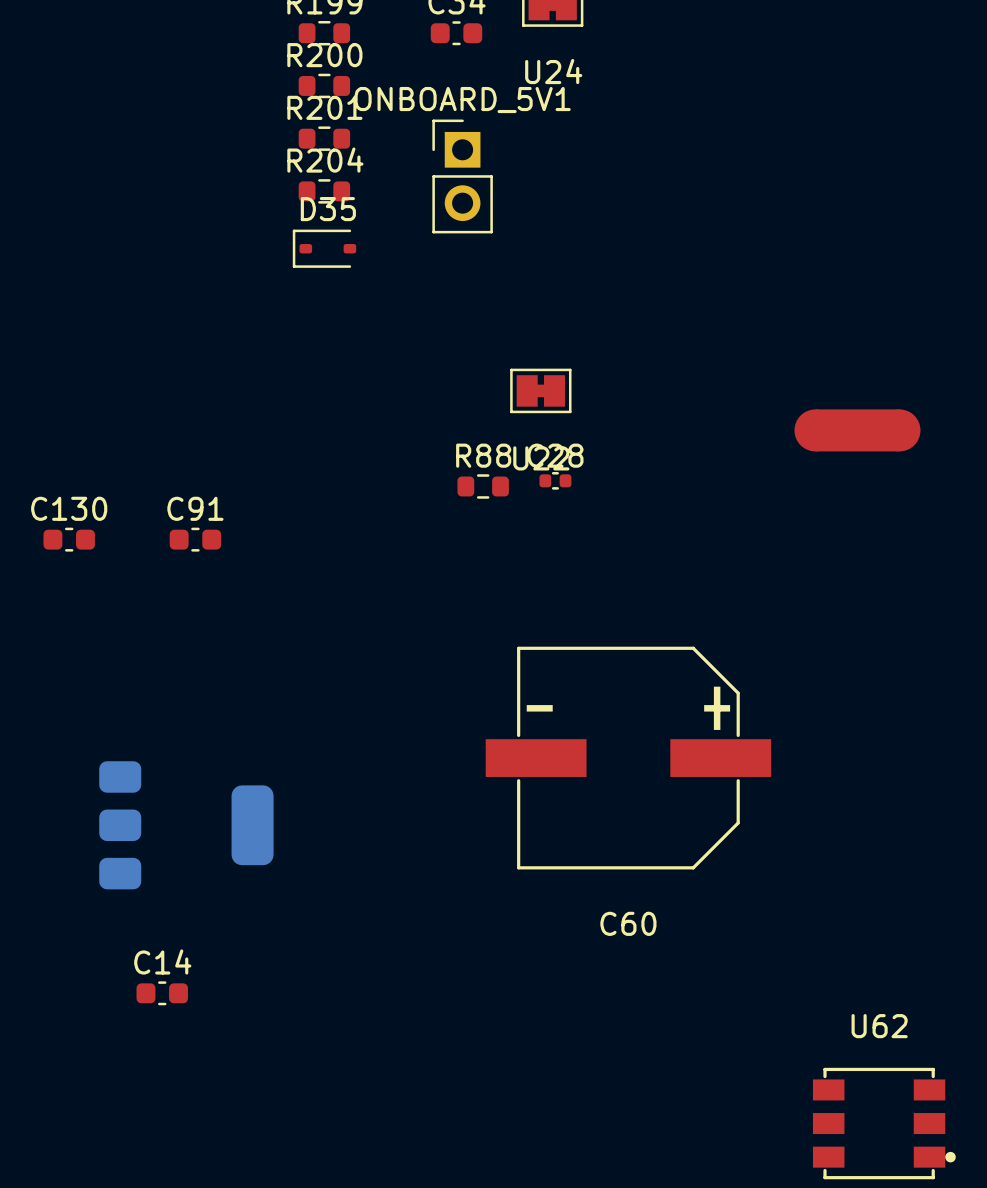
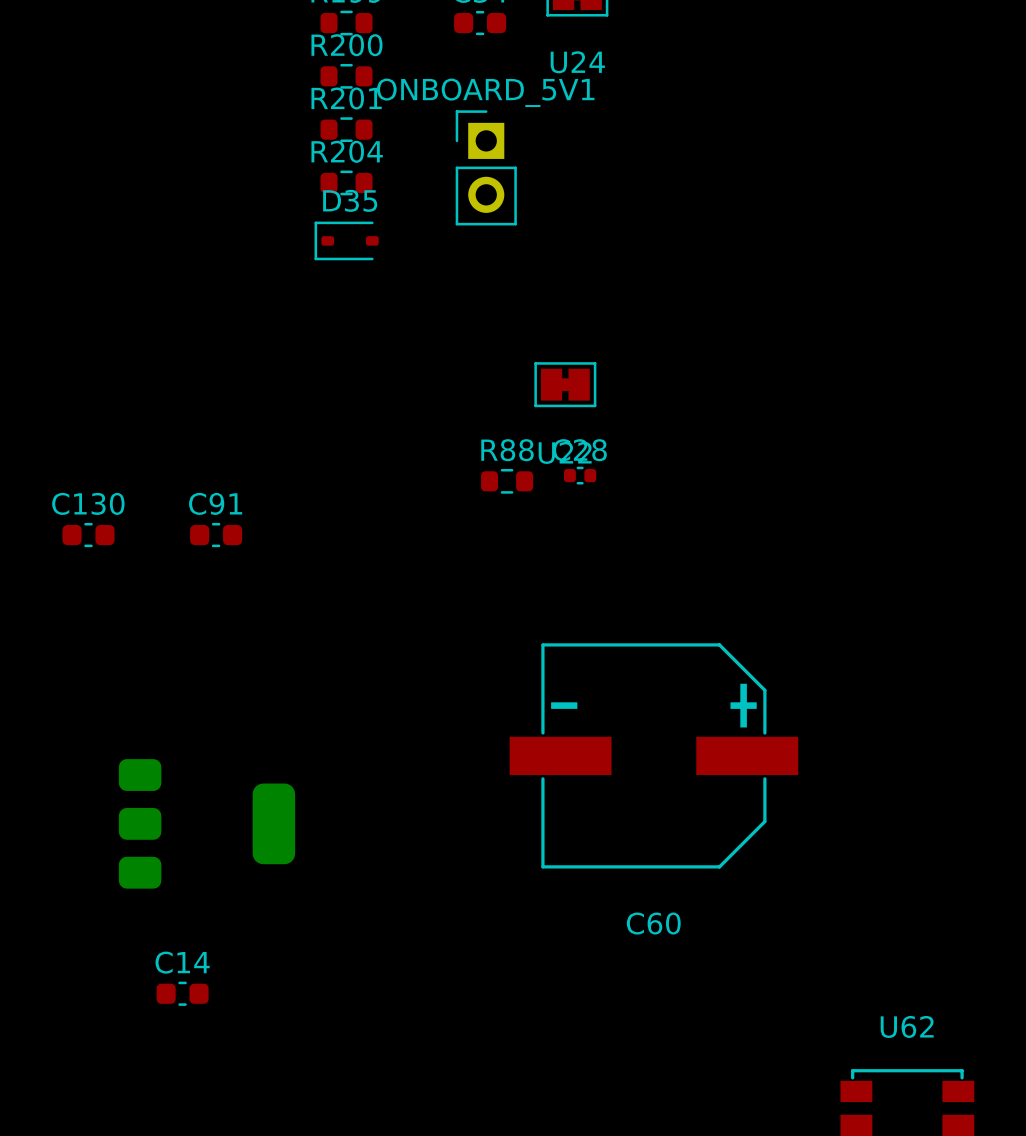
part: (857, 430) -> none

